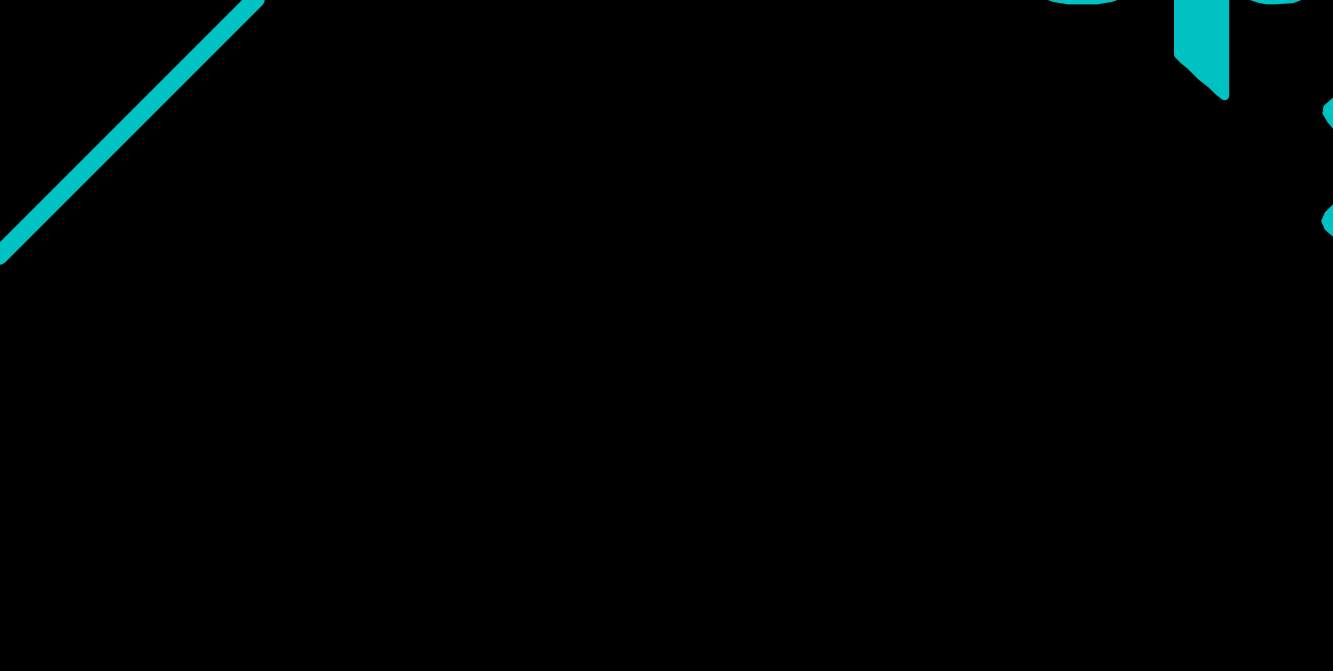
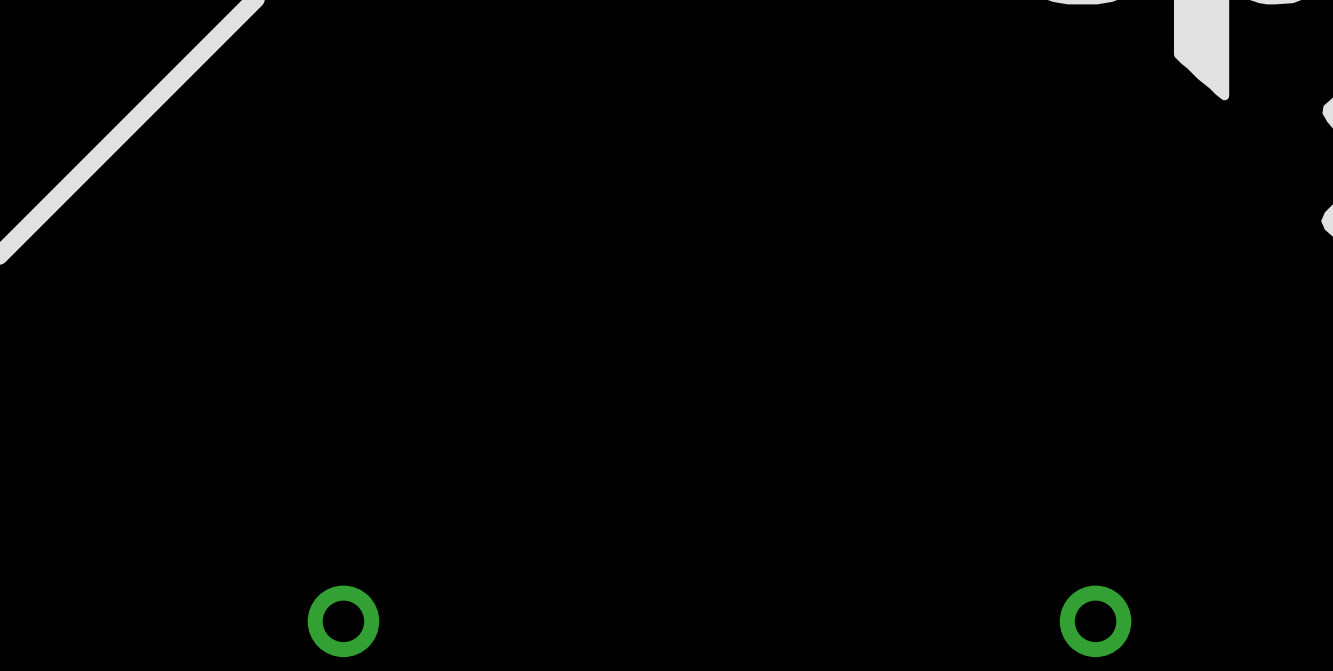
via: none -> (343, 621)
via: none -> (1095, 621)

